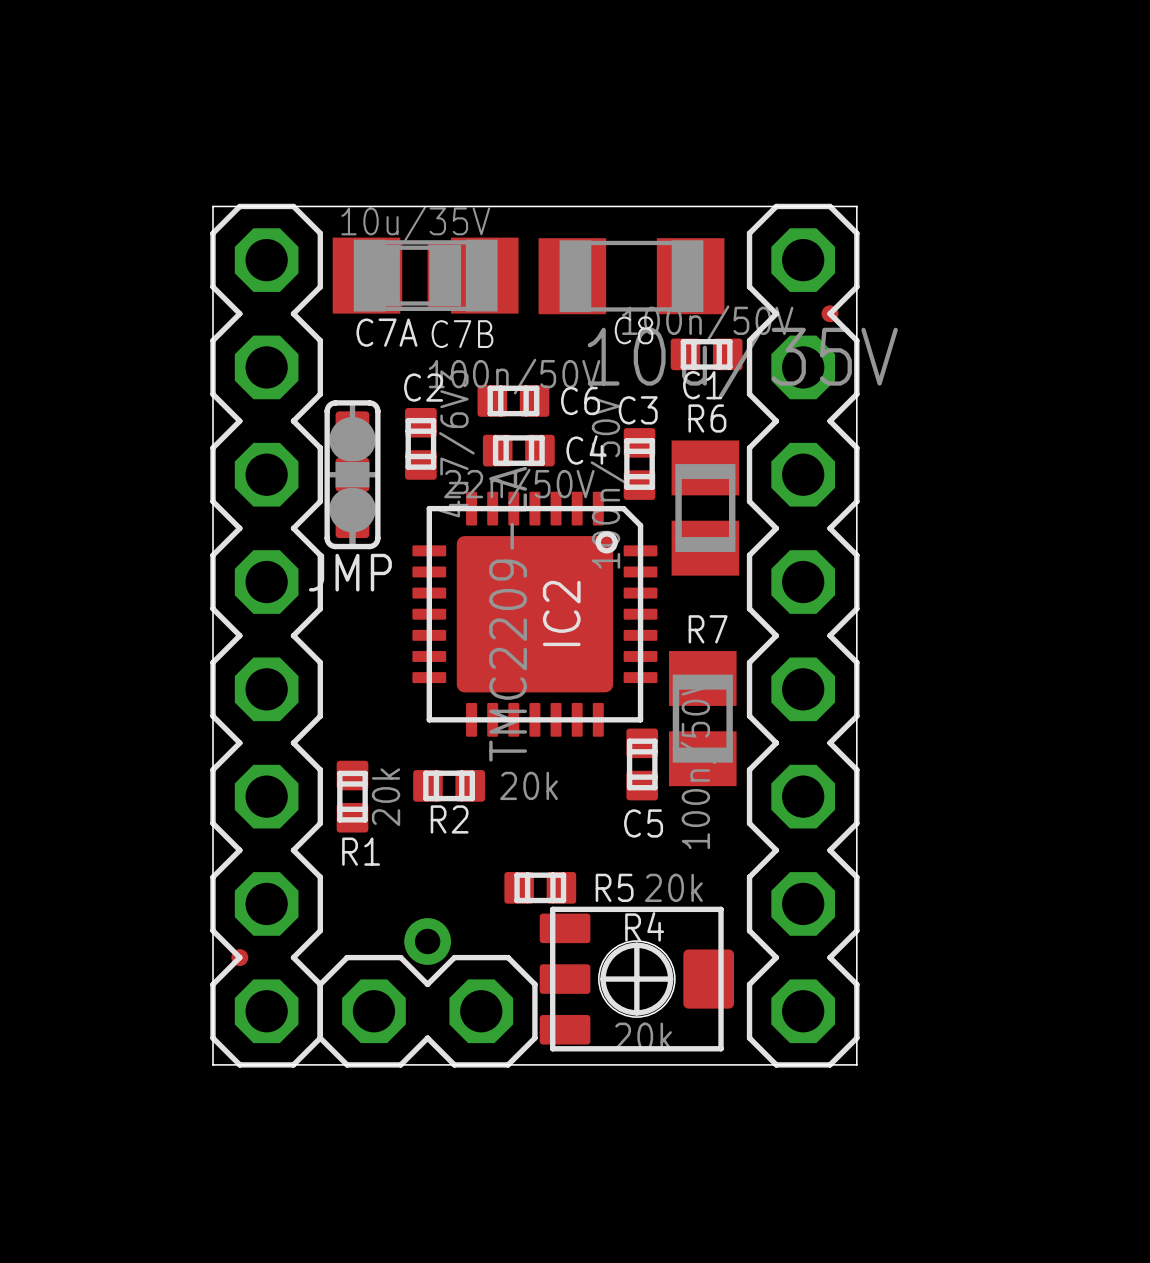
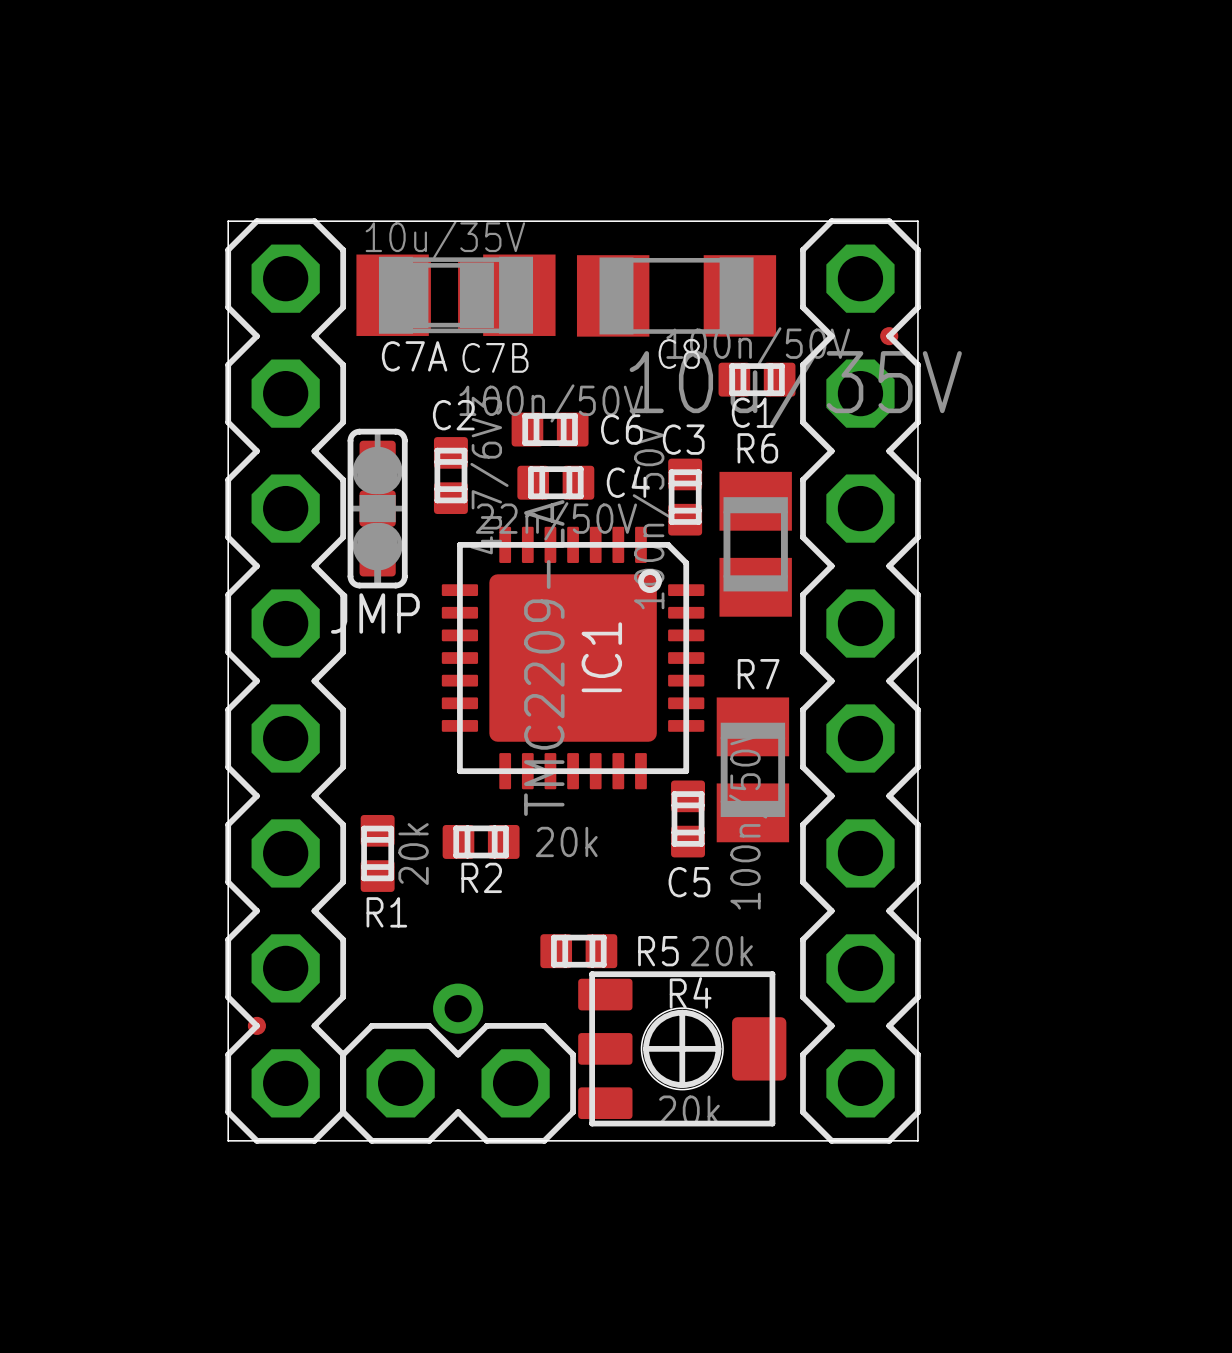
IC2 name: IC2 (561, 613) -> IC1 (601, 657)

